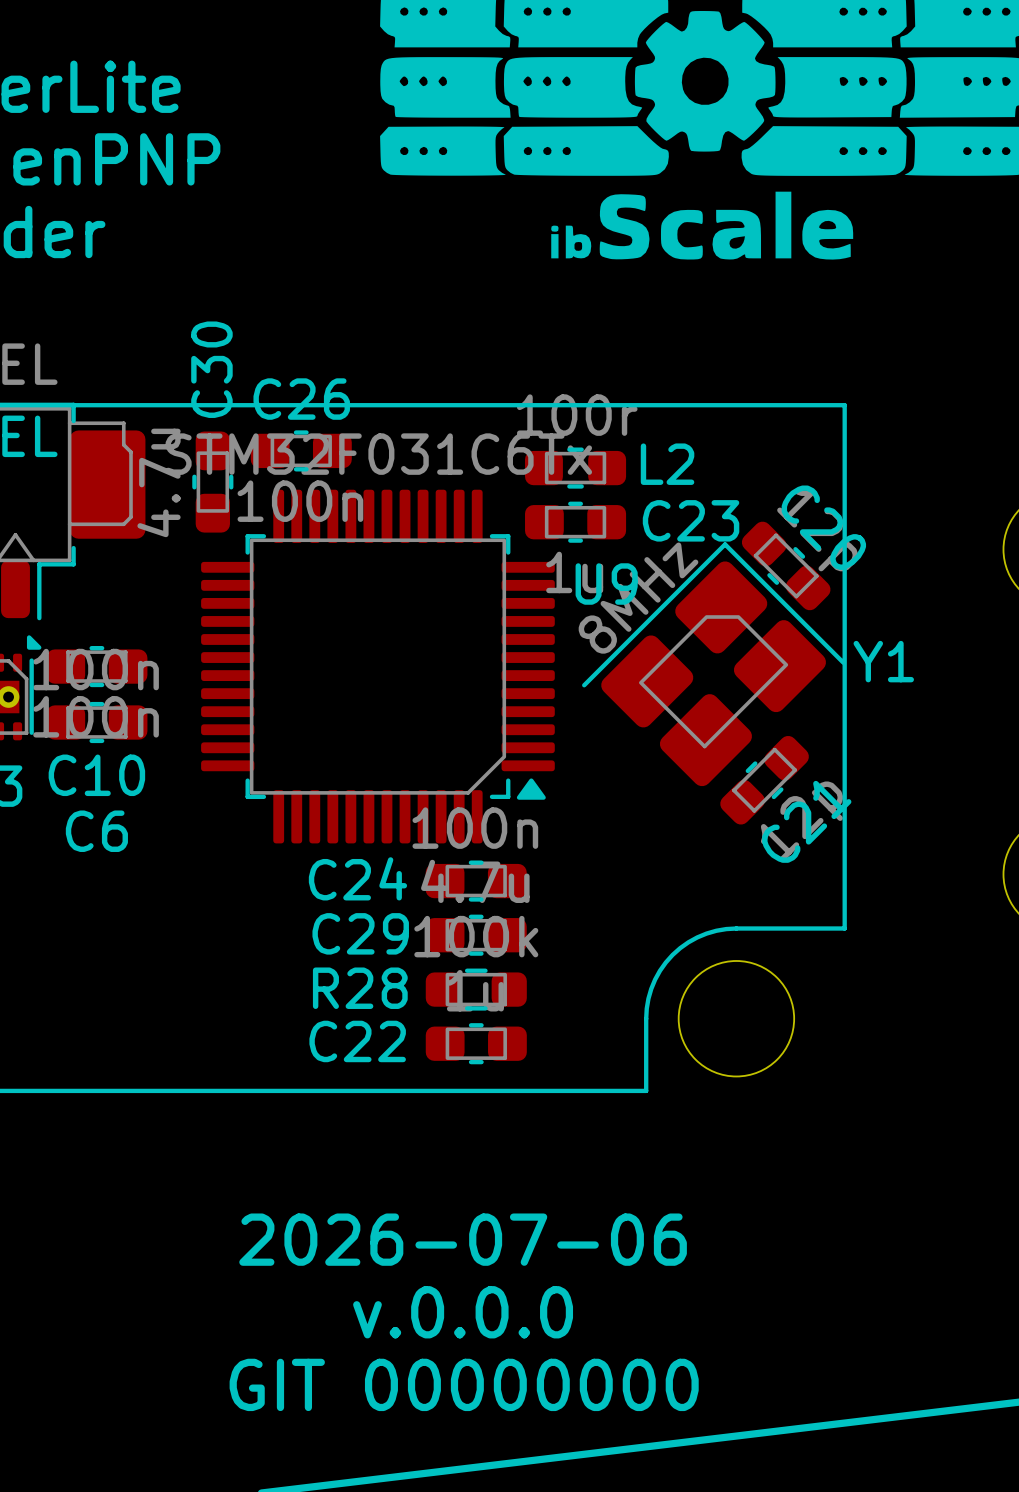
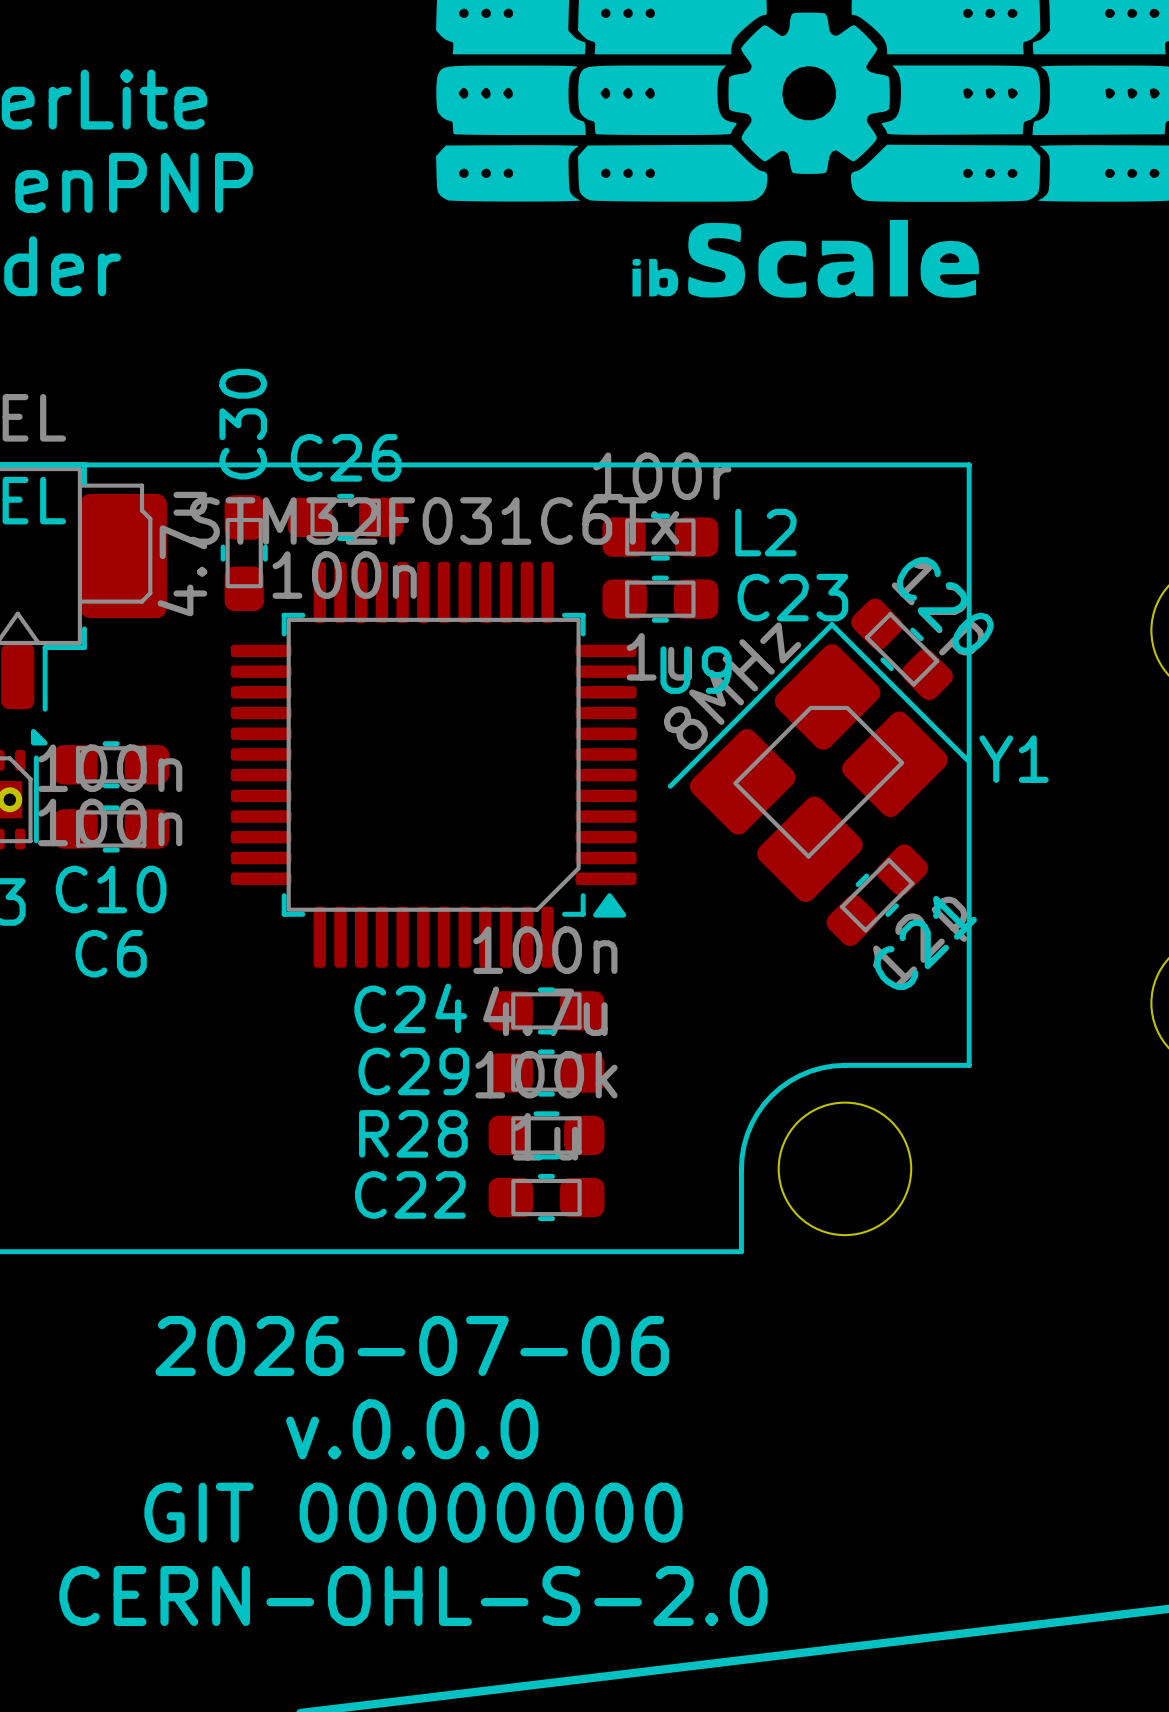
text position: 2026-07-06 (463, 1239) -> 2026-07-06 (412, 1345)
text position: v.0.0.0 (463, 1312) -> v.0.0.0 (412, 1429)
text position: GIT 00000000 (464, 1384) -> GIT 00000000 (413, 1512)
text: none -> CERN-OHL-S-2.0 (413, 1595)

